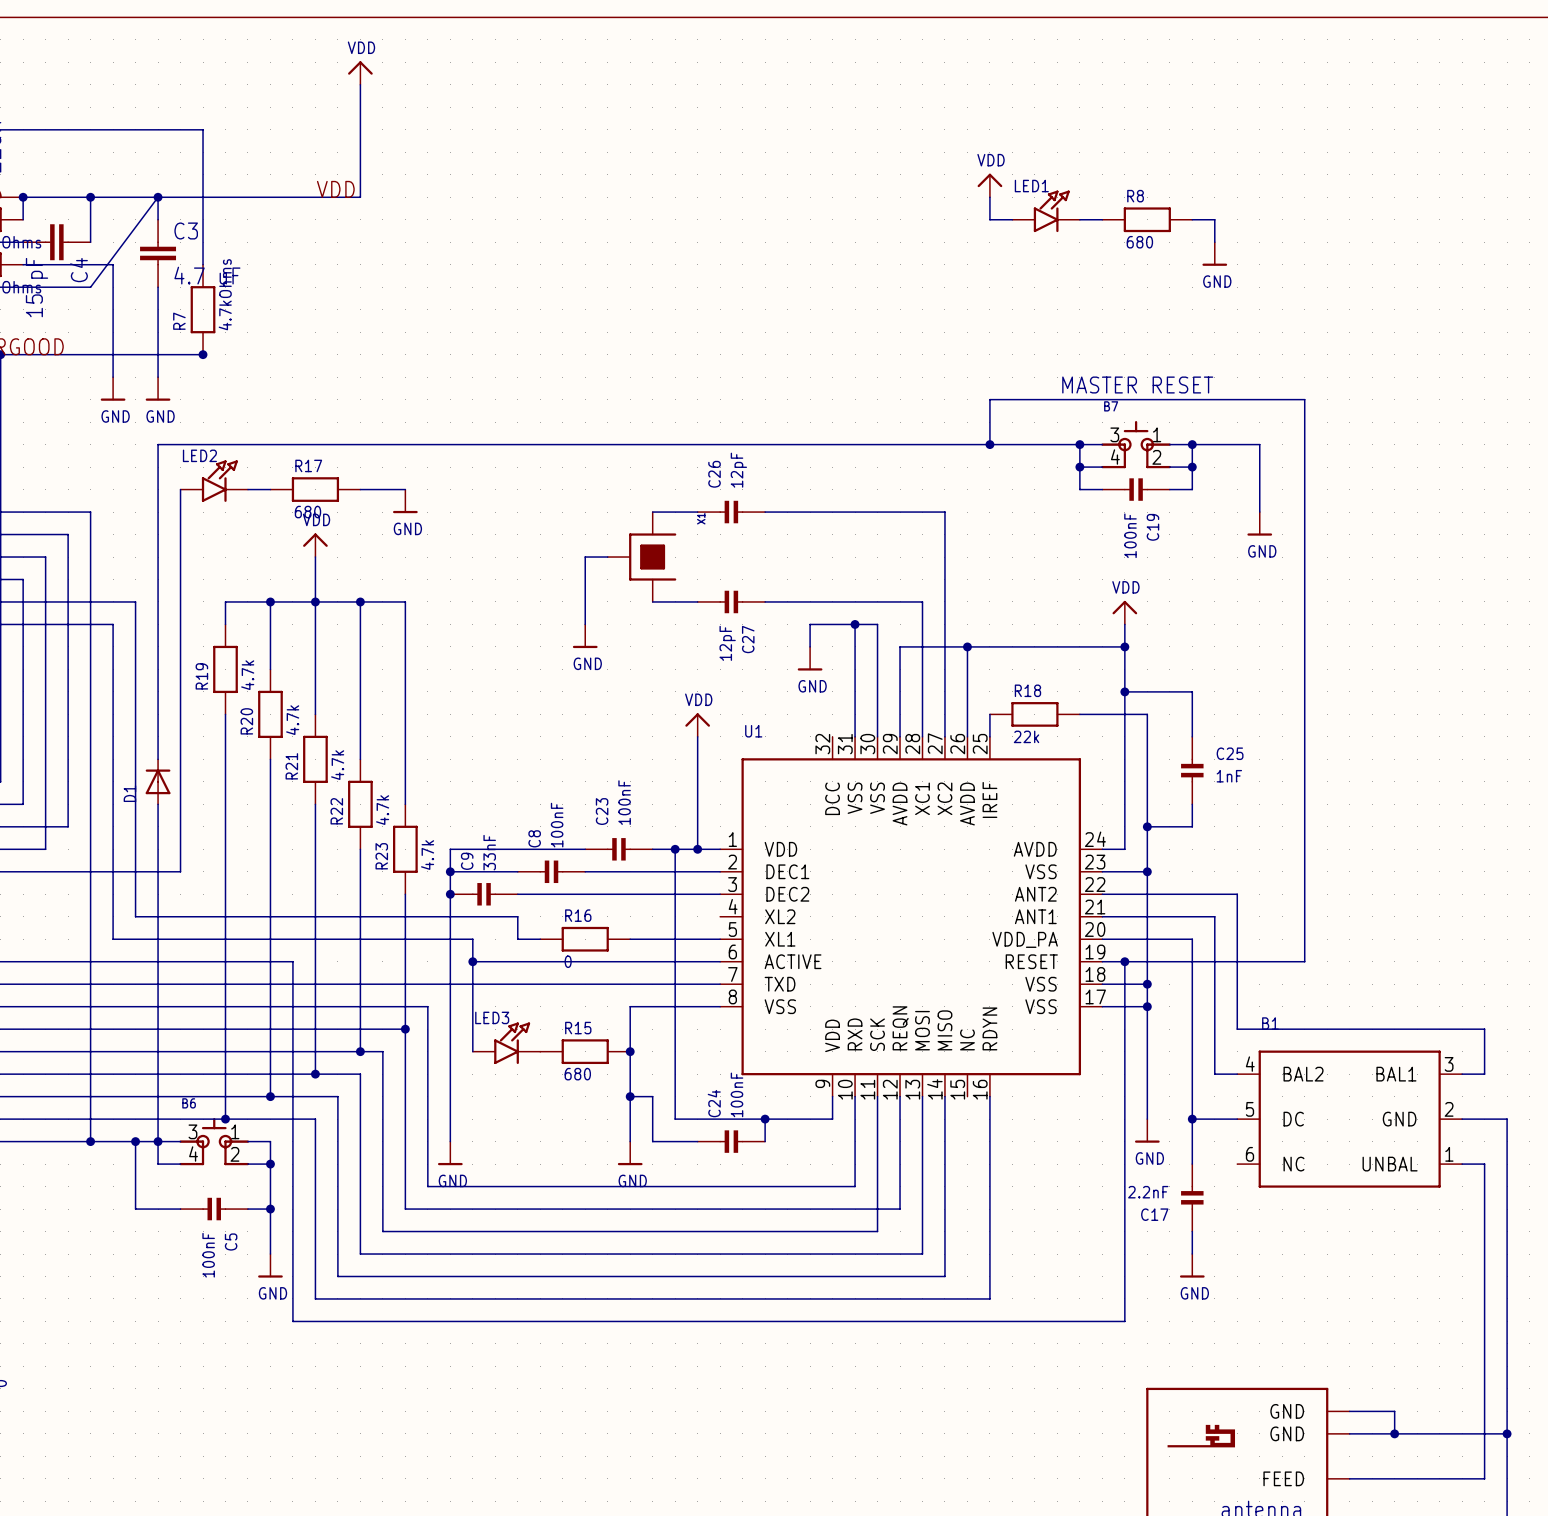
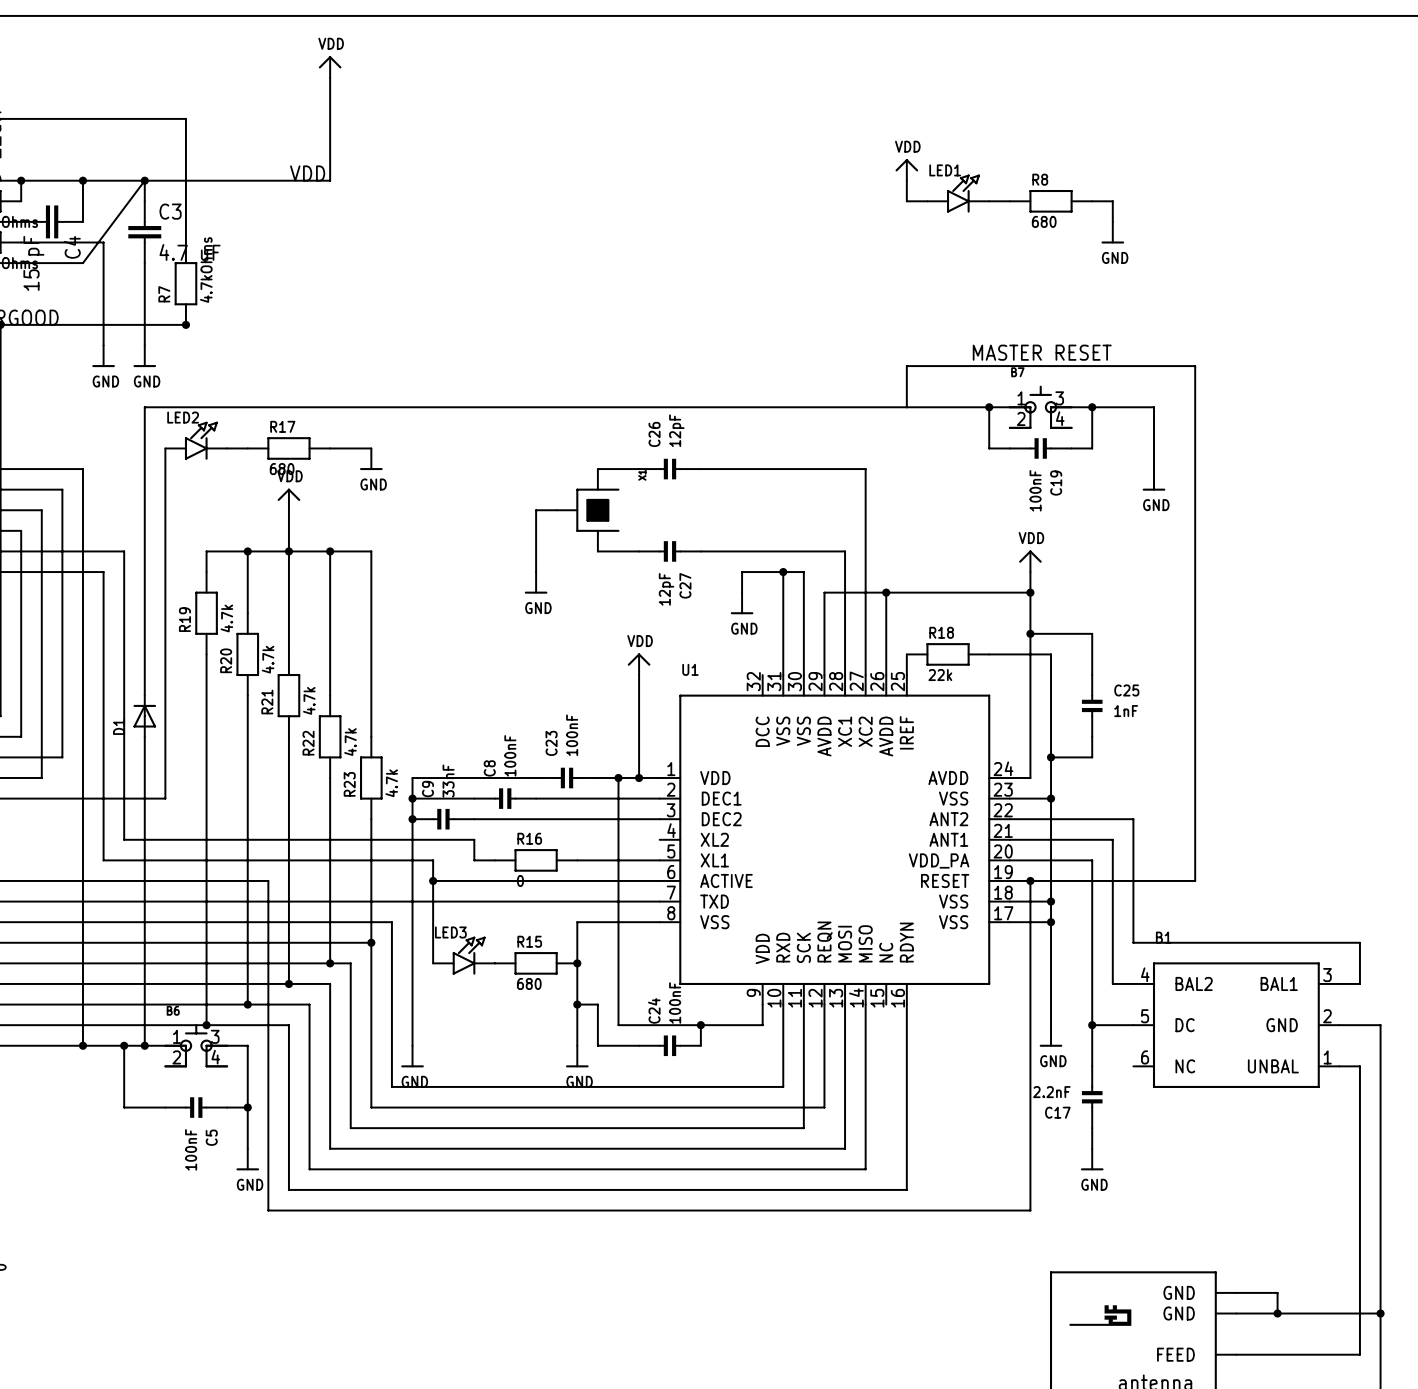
junction: (989, 444) -> none
B7 flip: as is (1136, 444) -> left-right (1040, 407)
wire: (1079, 467) (1102, 467) -> none
junction: (1079, 467) -> none
wire: (1169, 467) (1192, 467) -> none
junction: (1192, 467) -> none
wire: (158, 1141) (158, 1164) (180, 1164) -> none
B6 flip: as is (214, 1141) -> left-right (196, 1045)
wire: (247, 1164) (270, 1164) -> none
junction: (270, 1164) -> none

